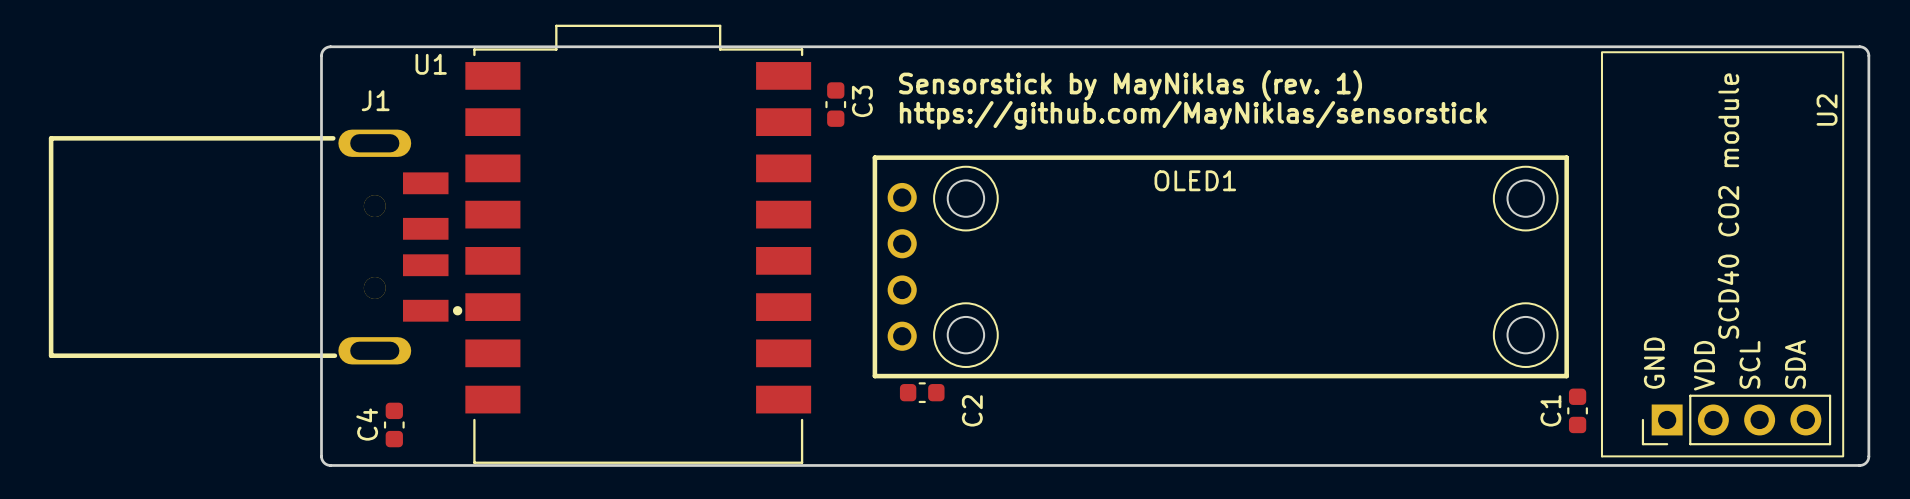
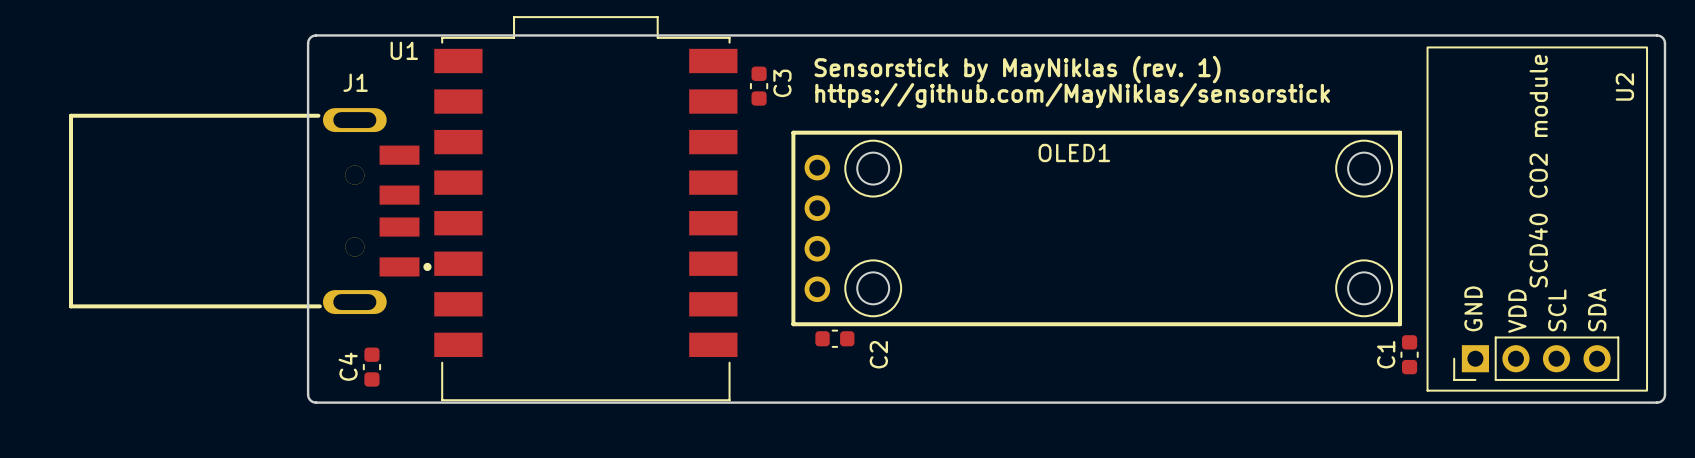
U2 footprint: [1601, 51, 1845, 458] -> [1426, 46, 1648, 392]

